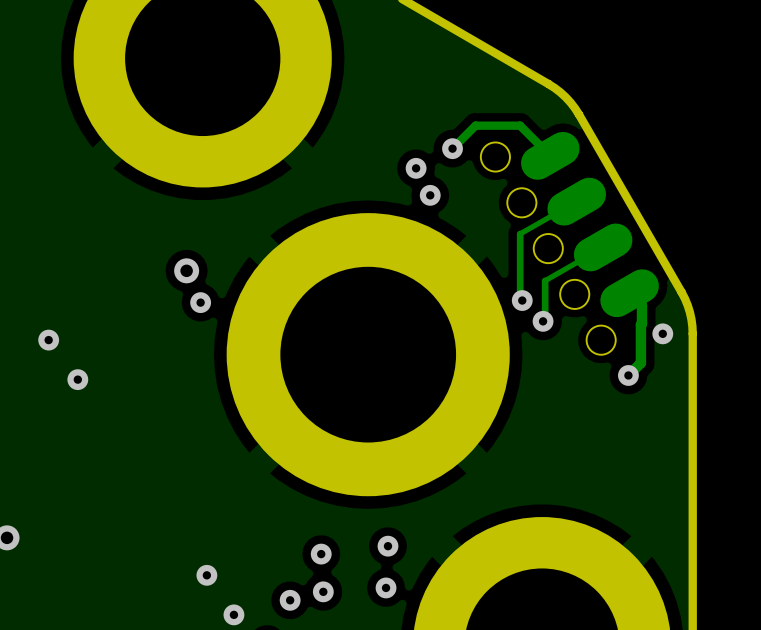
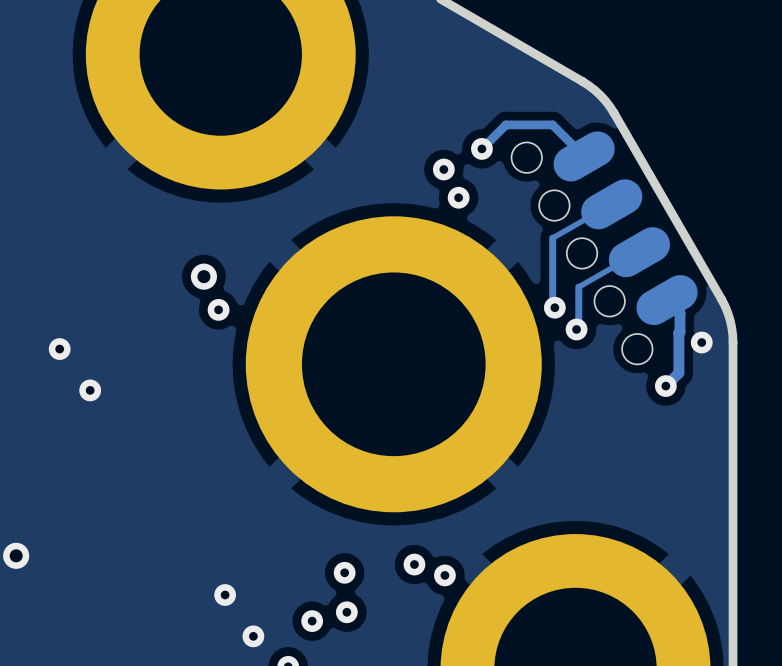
via position: (386, 587) -> (444, 575)

